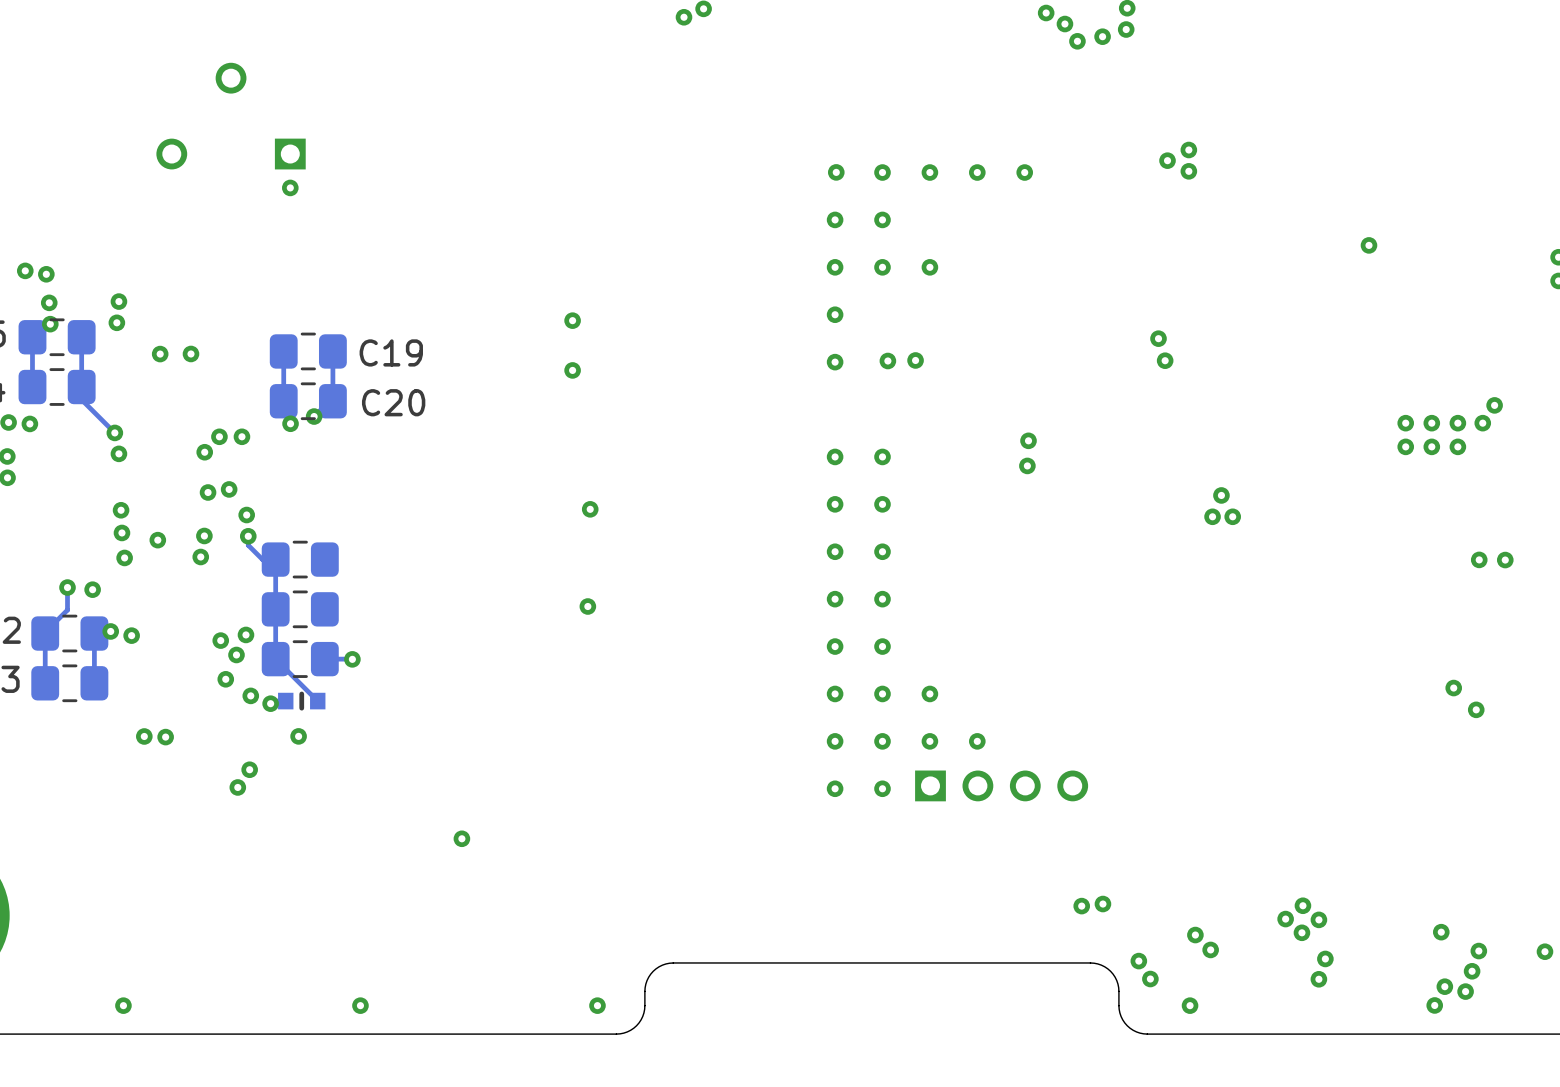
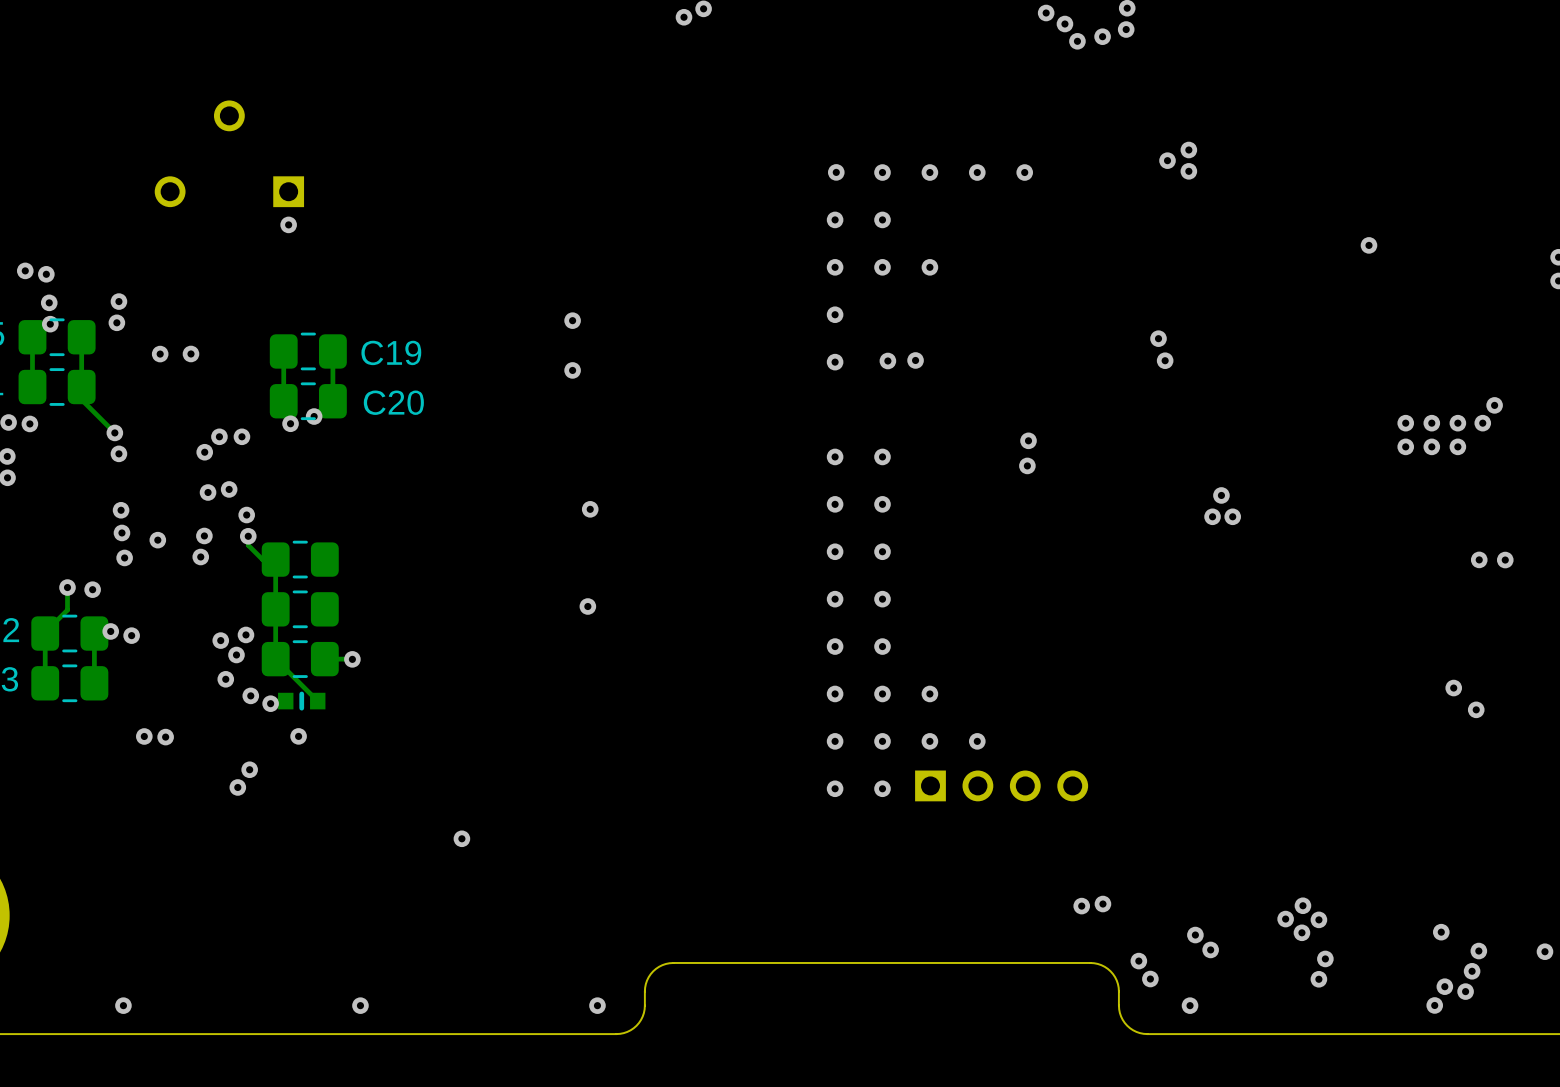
part position: (231, 116) -> (229, 153)
via position: (290, 187) -> (288, 224)

